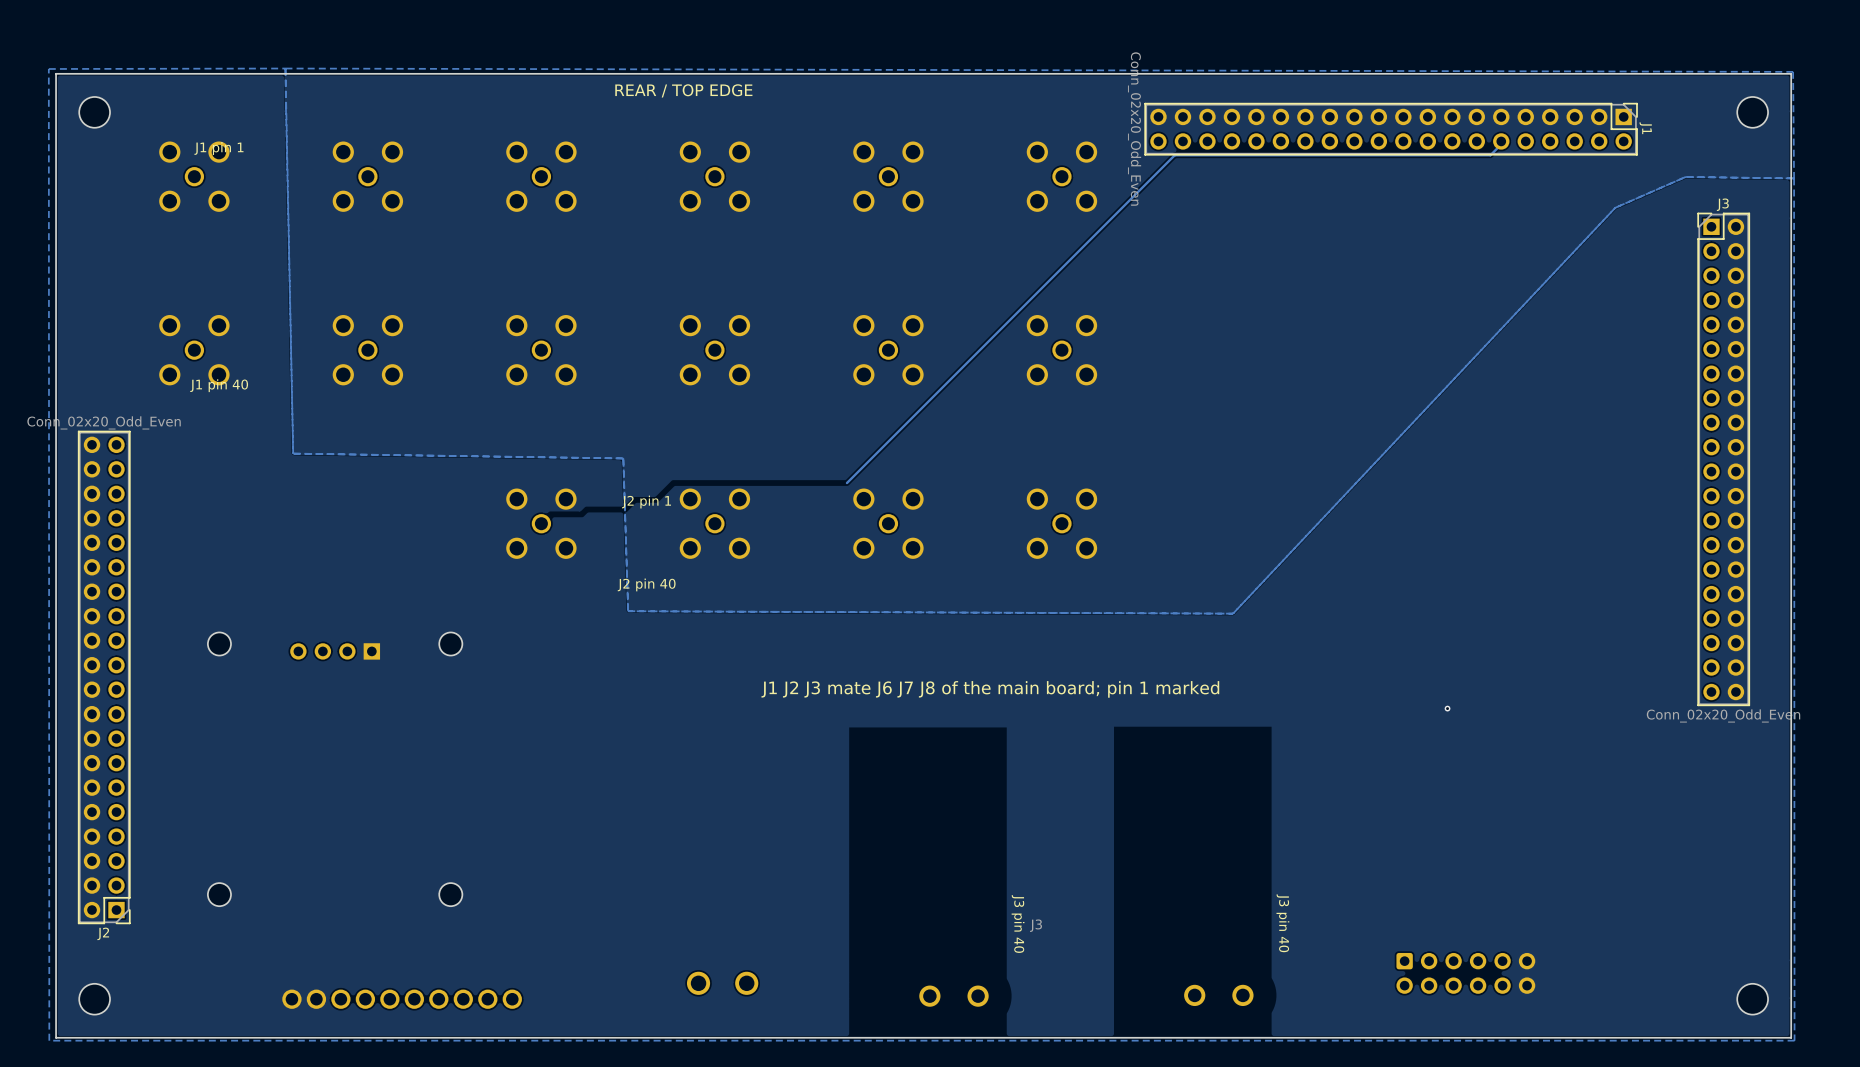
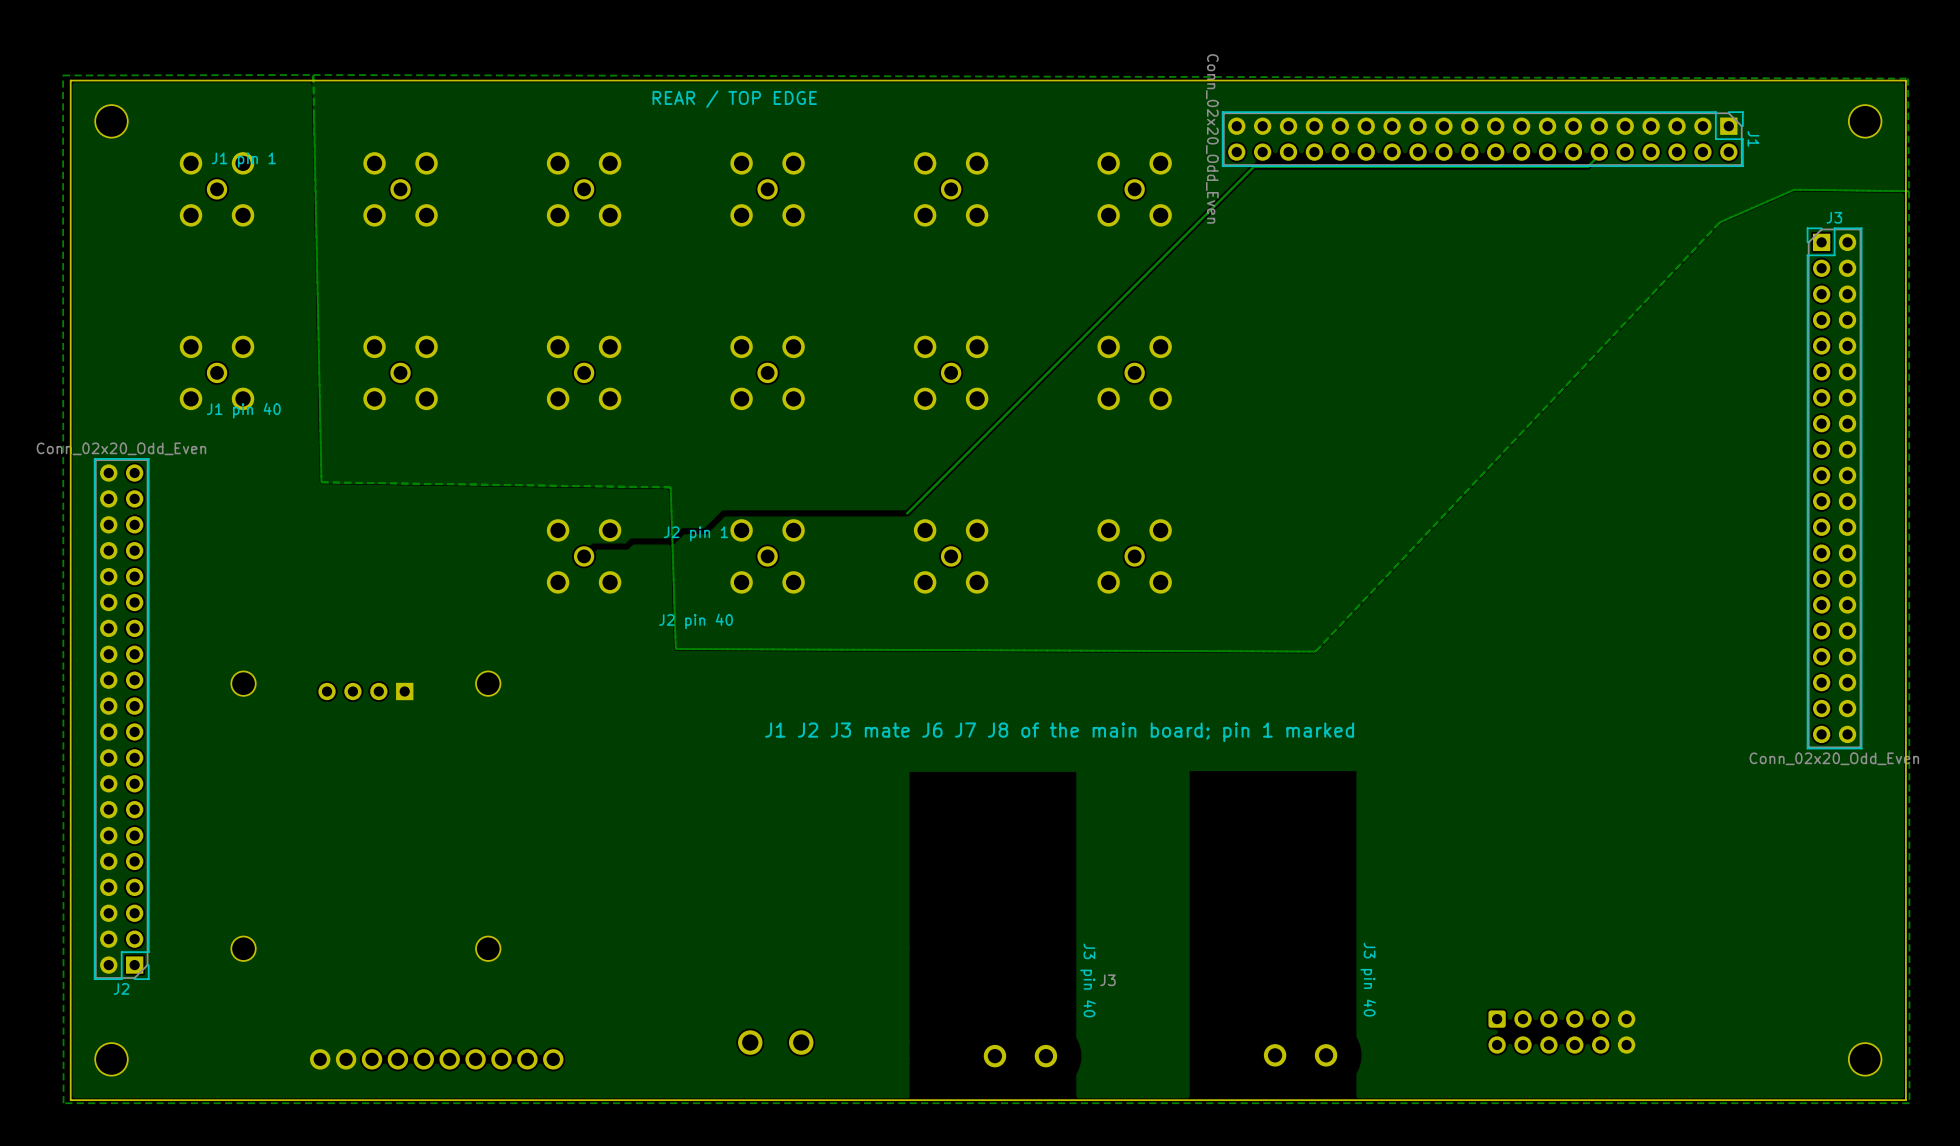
via: (1447, 708) -> none

